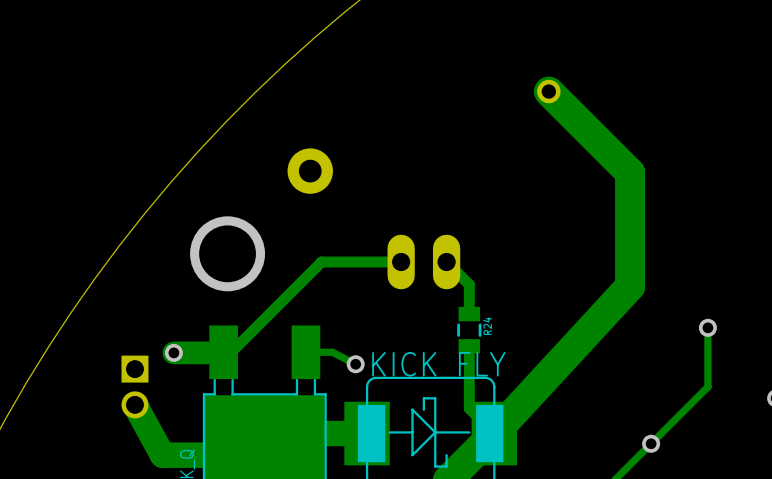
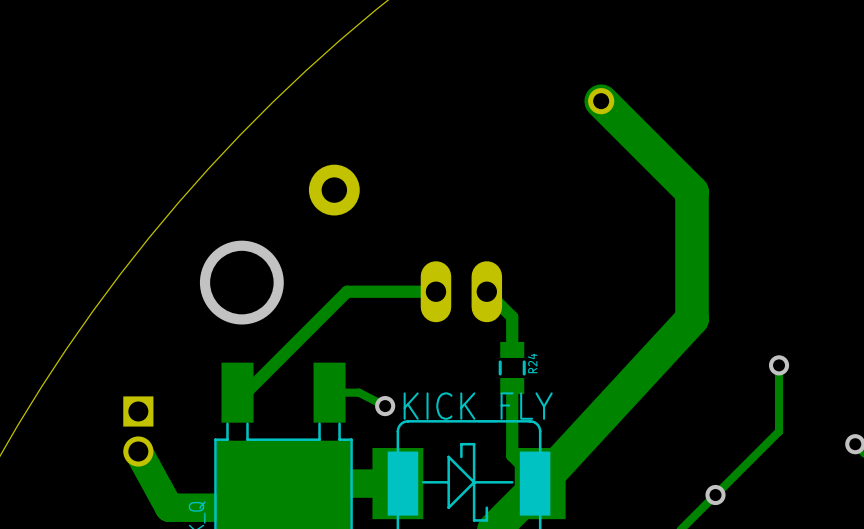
via: (173, 352) -> none
track: (223, 352) (173, 352) -> none

